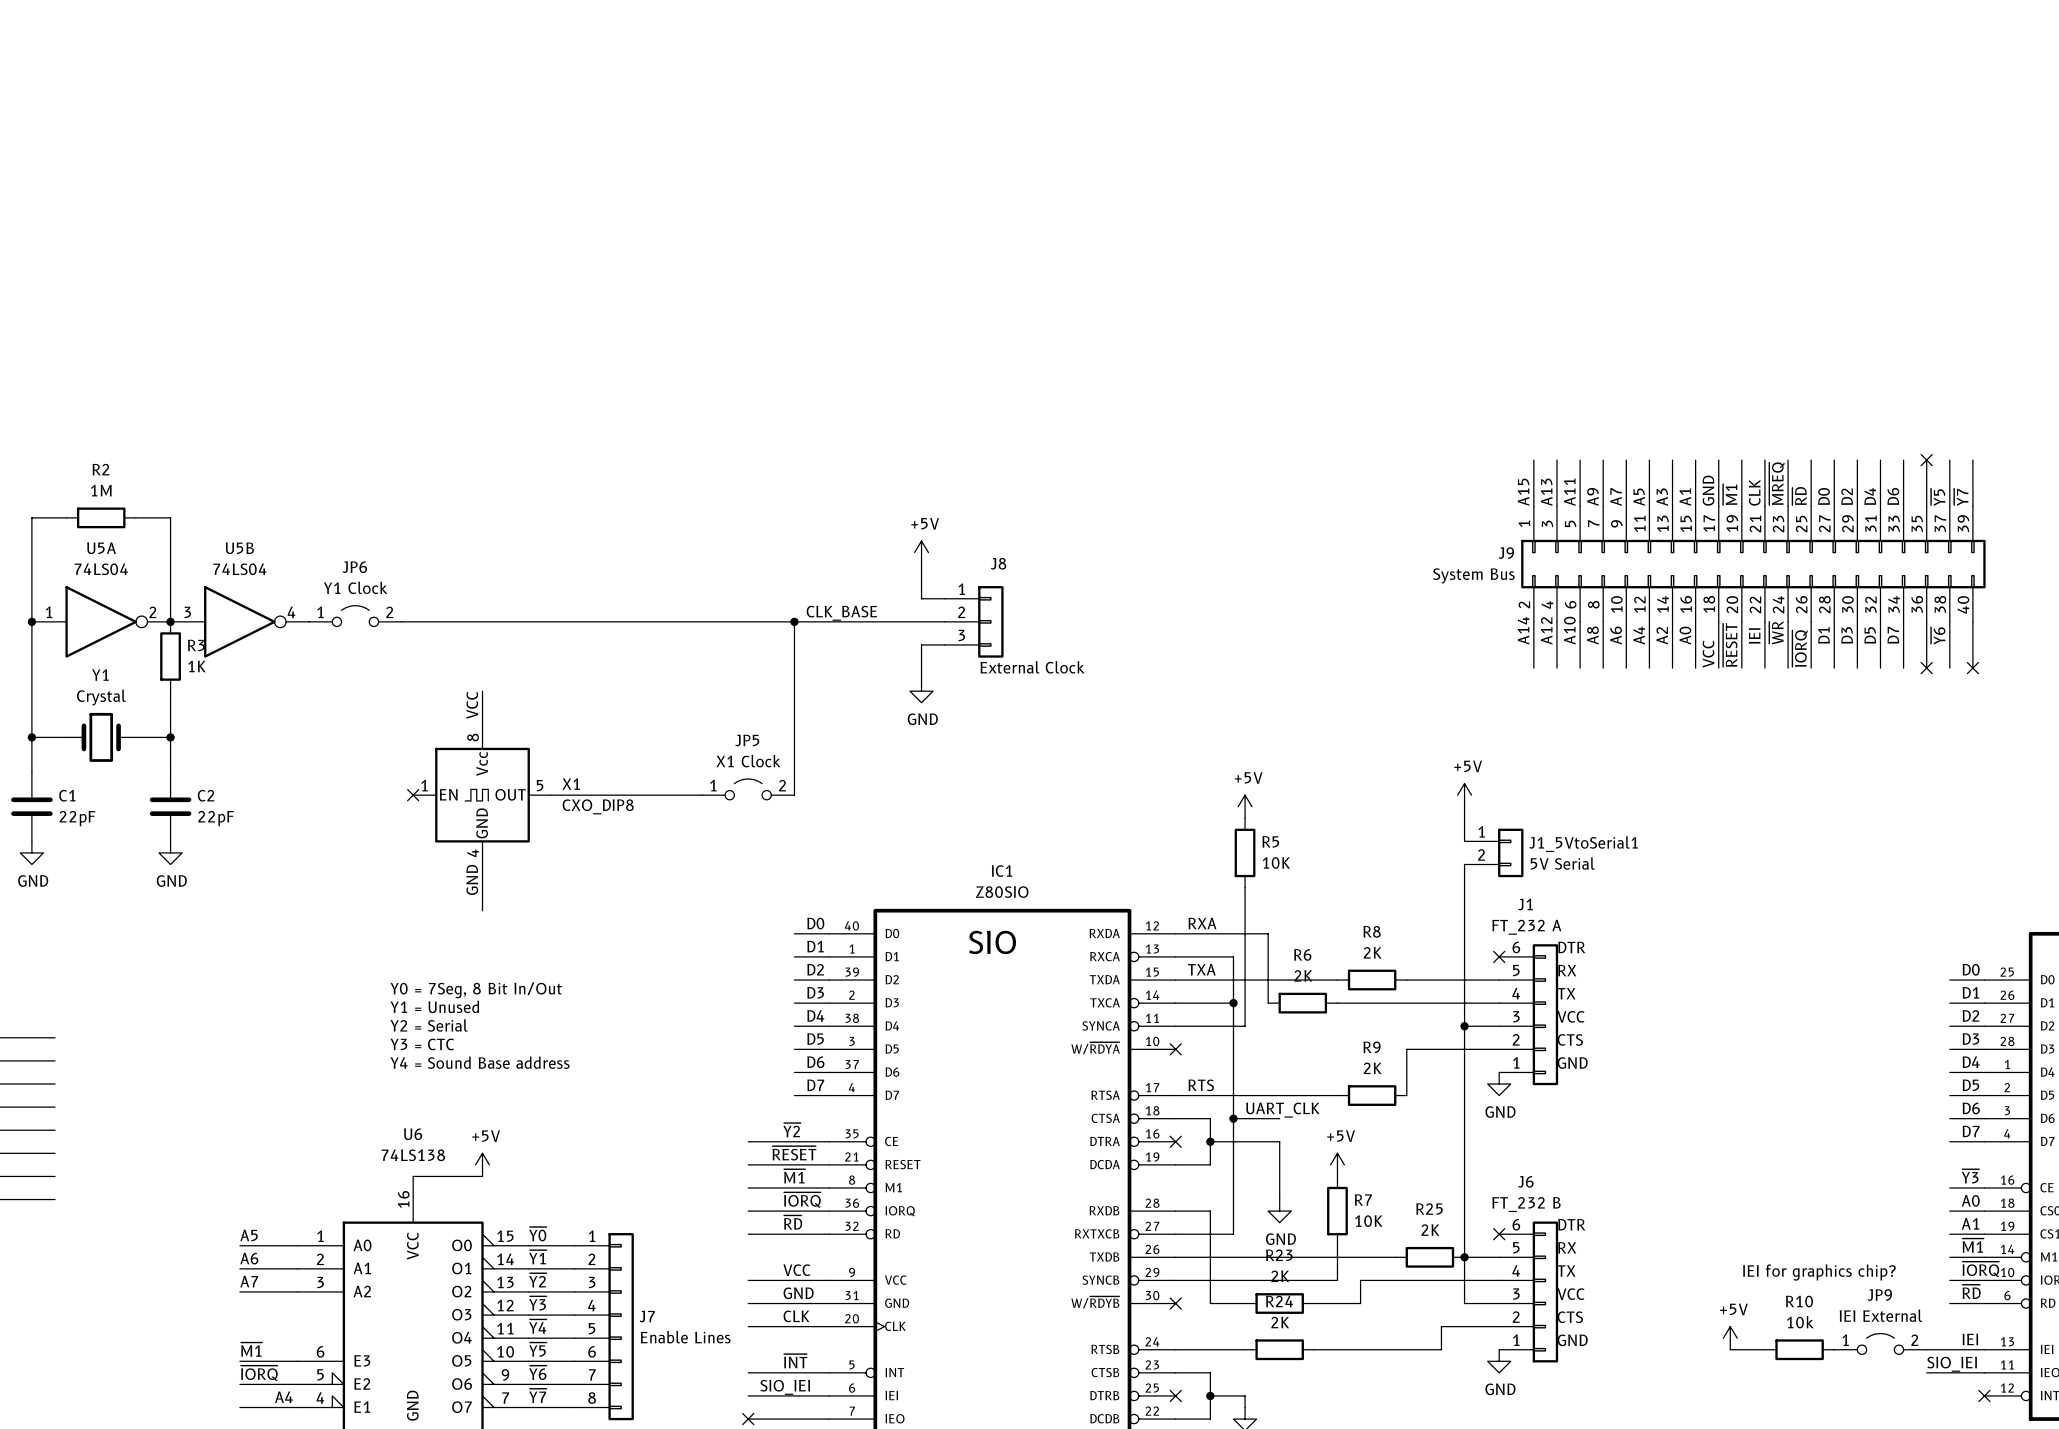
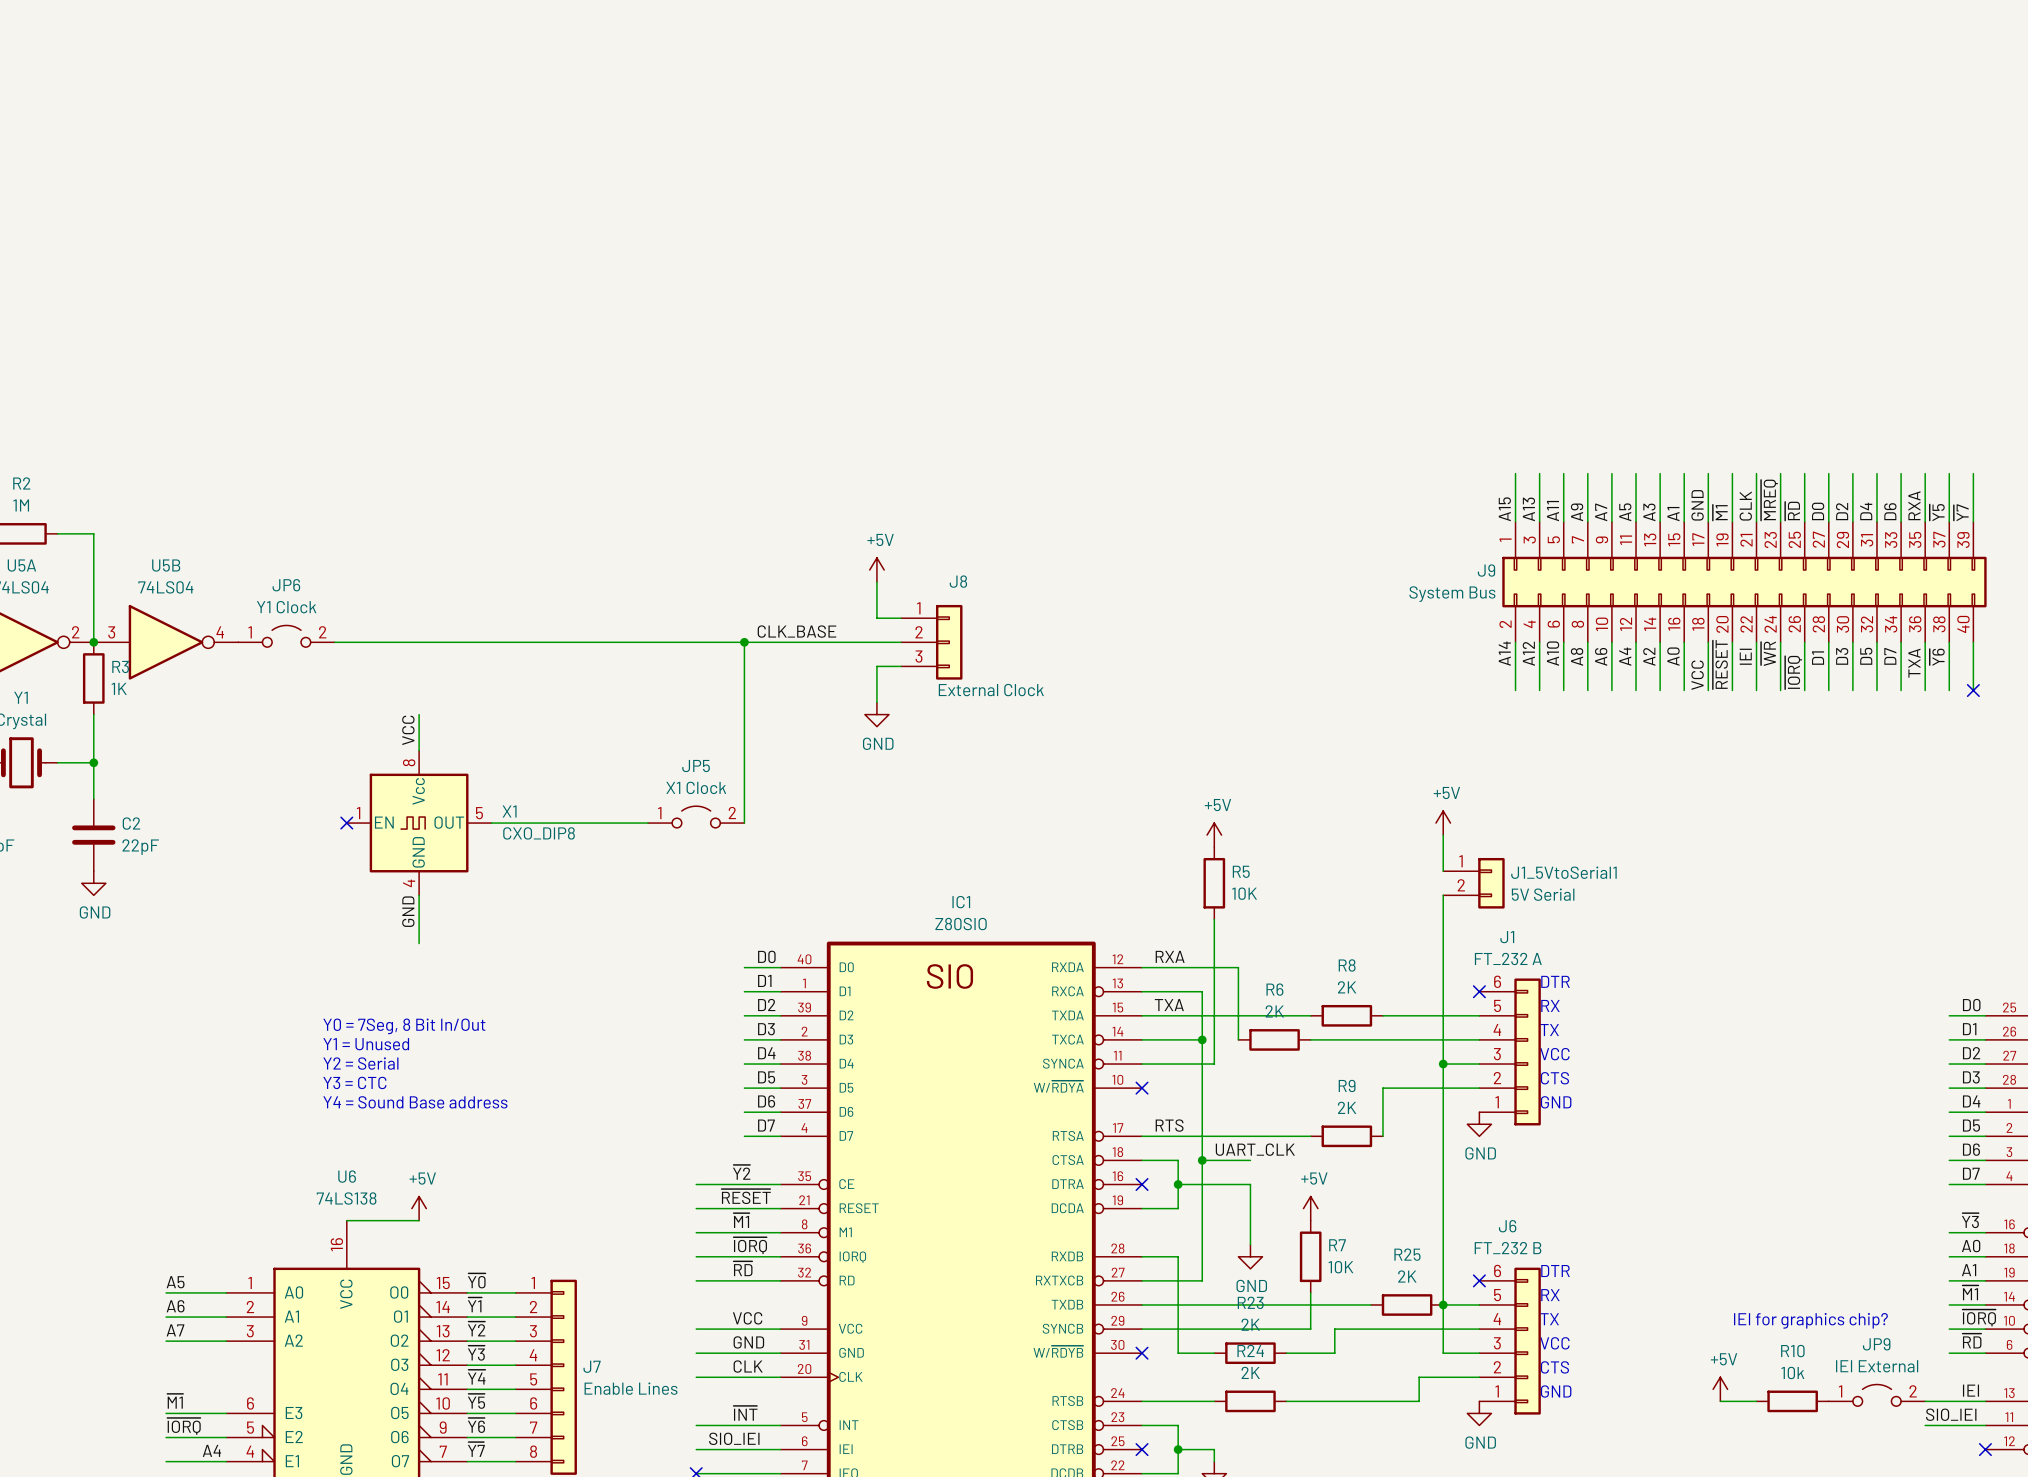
no-connect mark: (1926, 460) -> none
label: none -> RXA (1914, 505)
label: none -> TXA (1914, 663)
no-connect mark: (1926, 668) -> none

